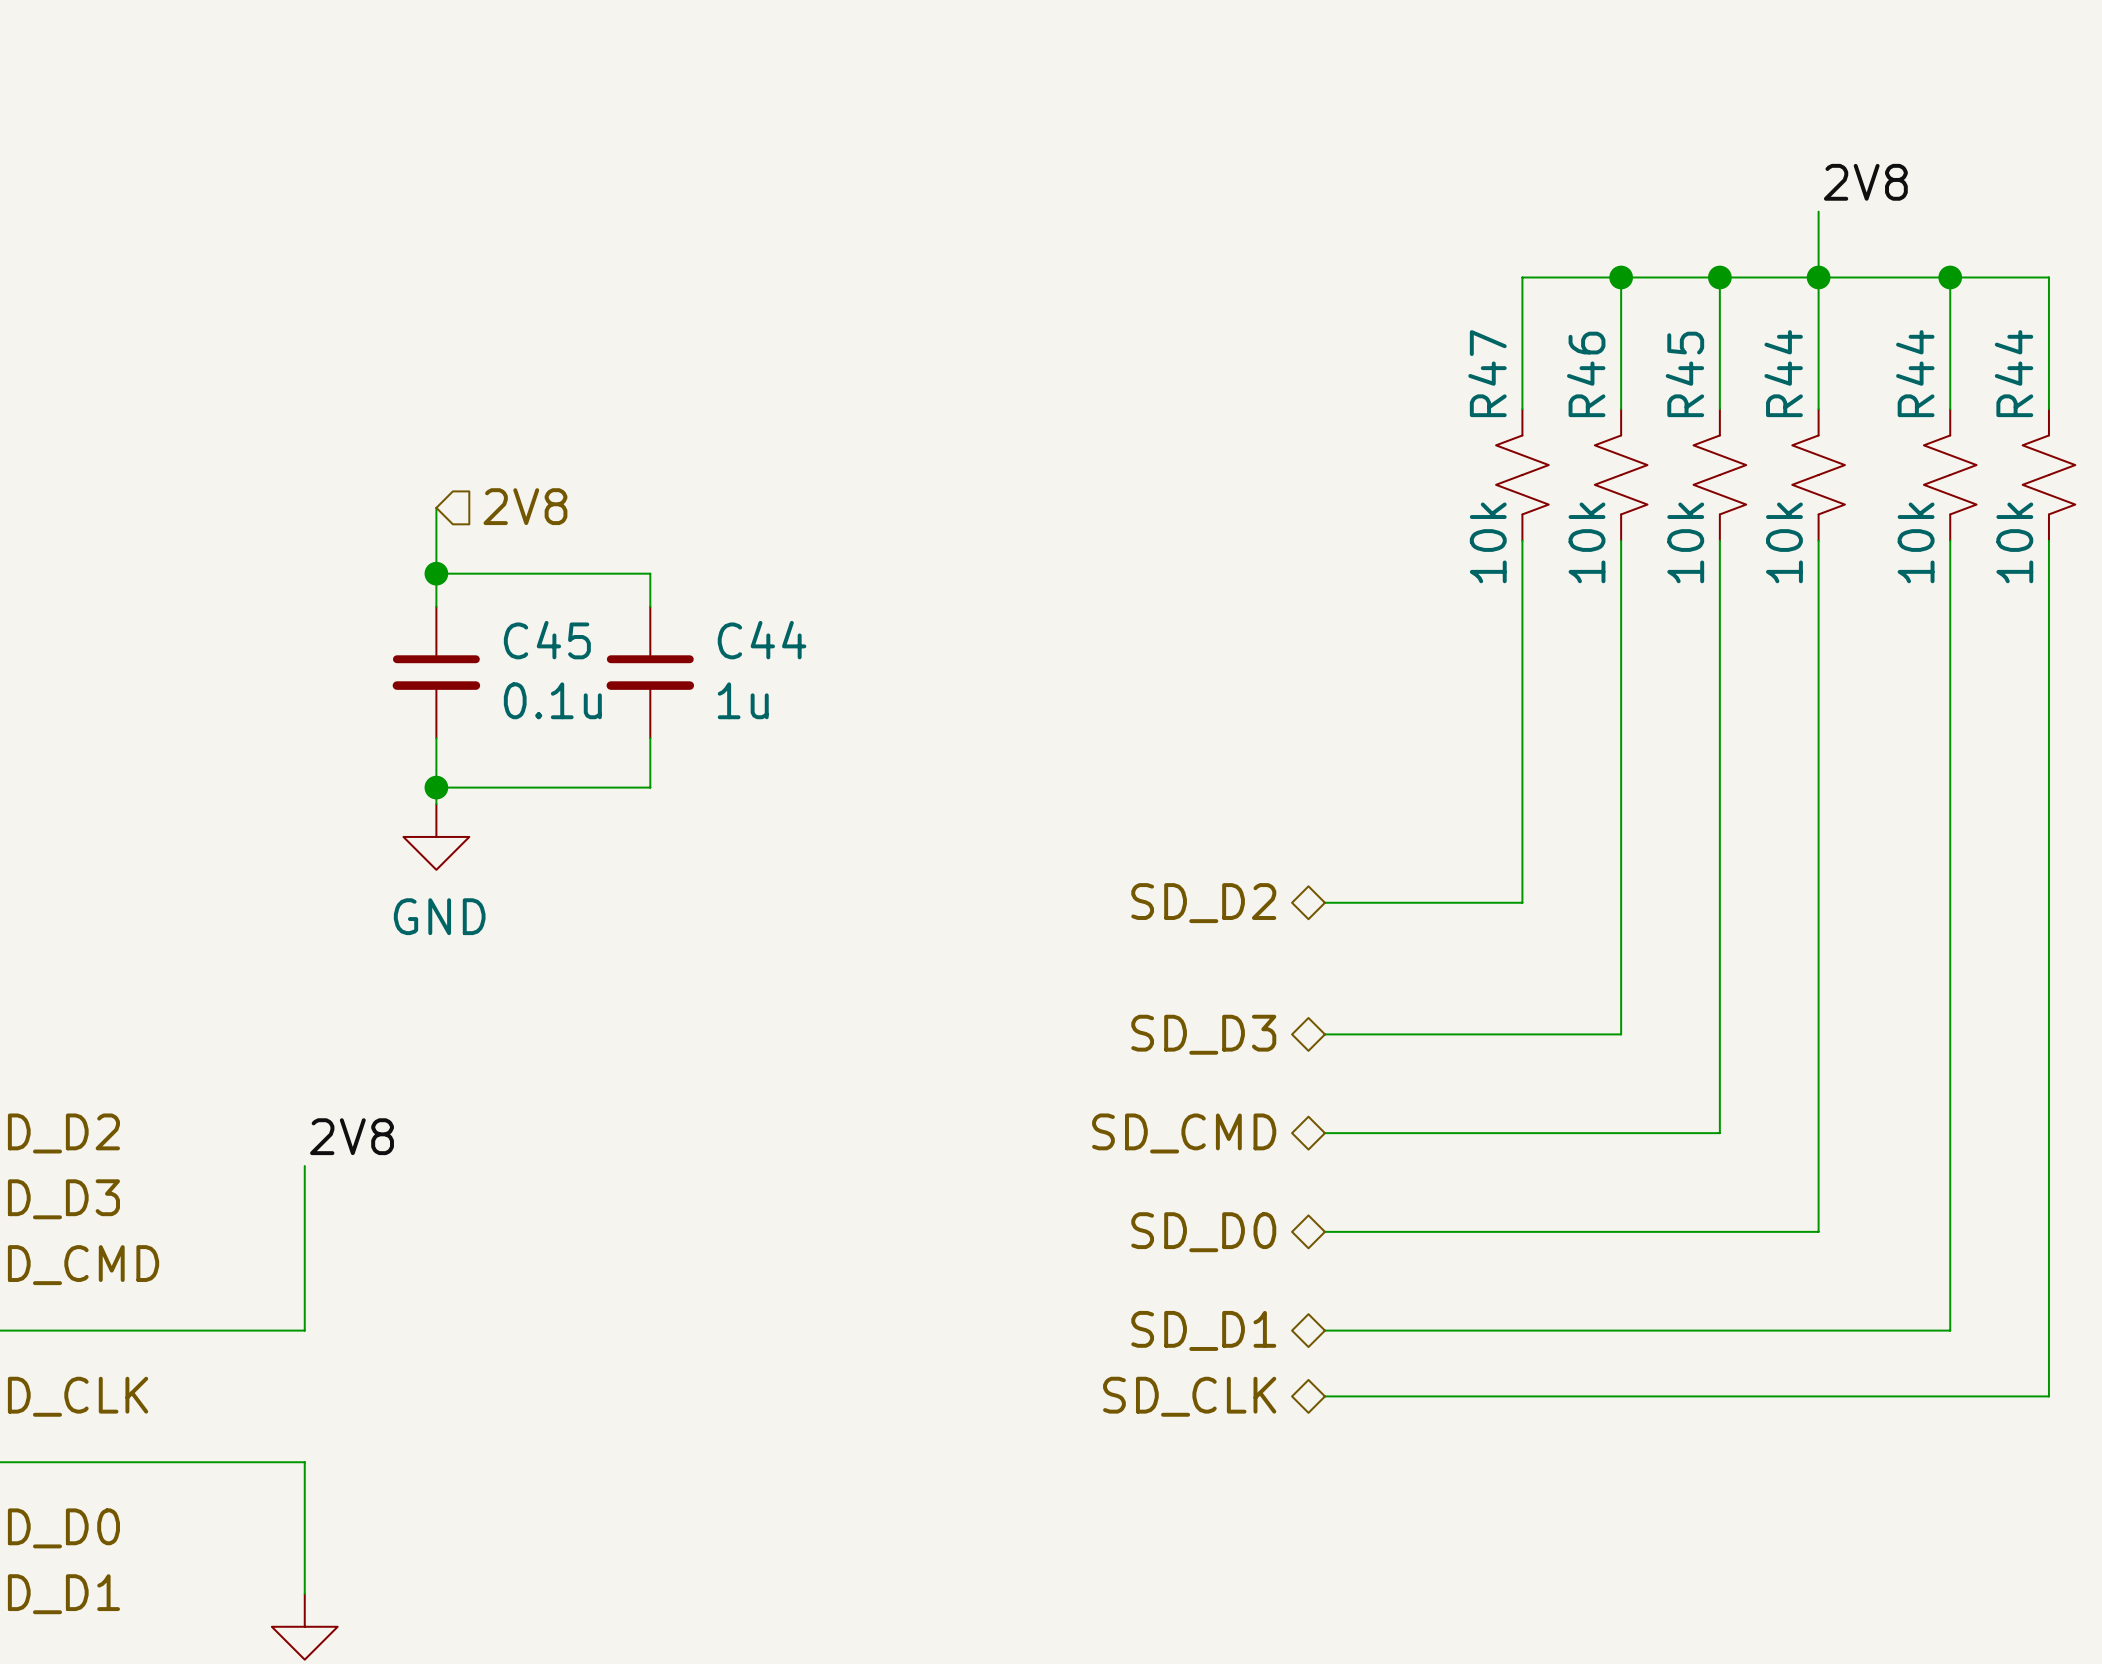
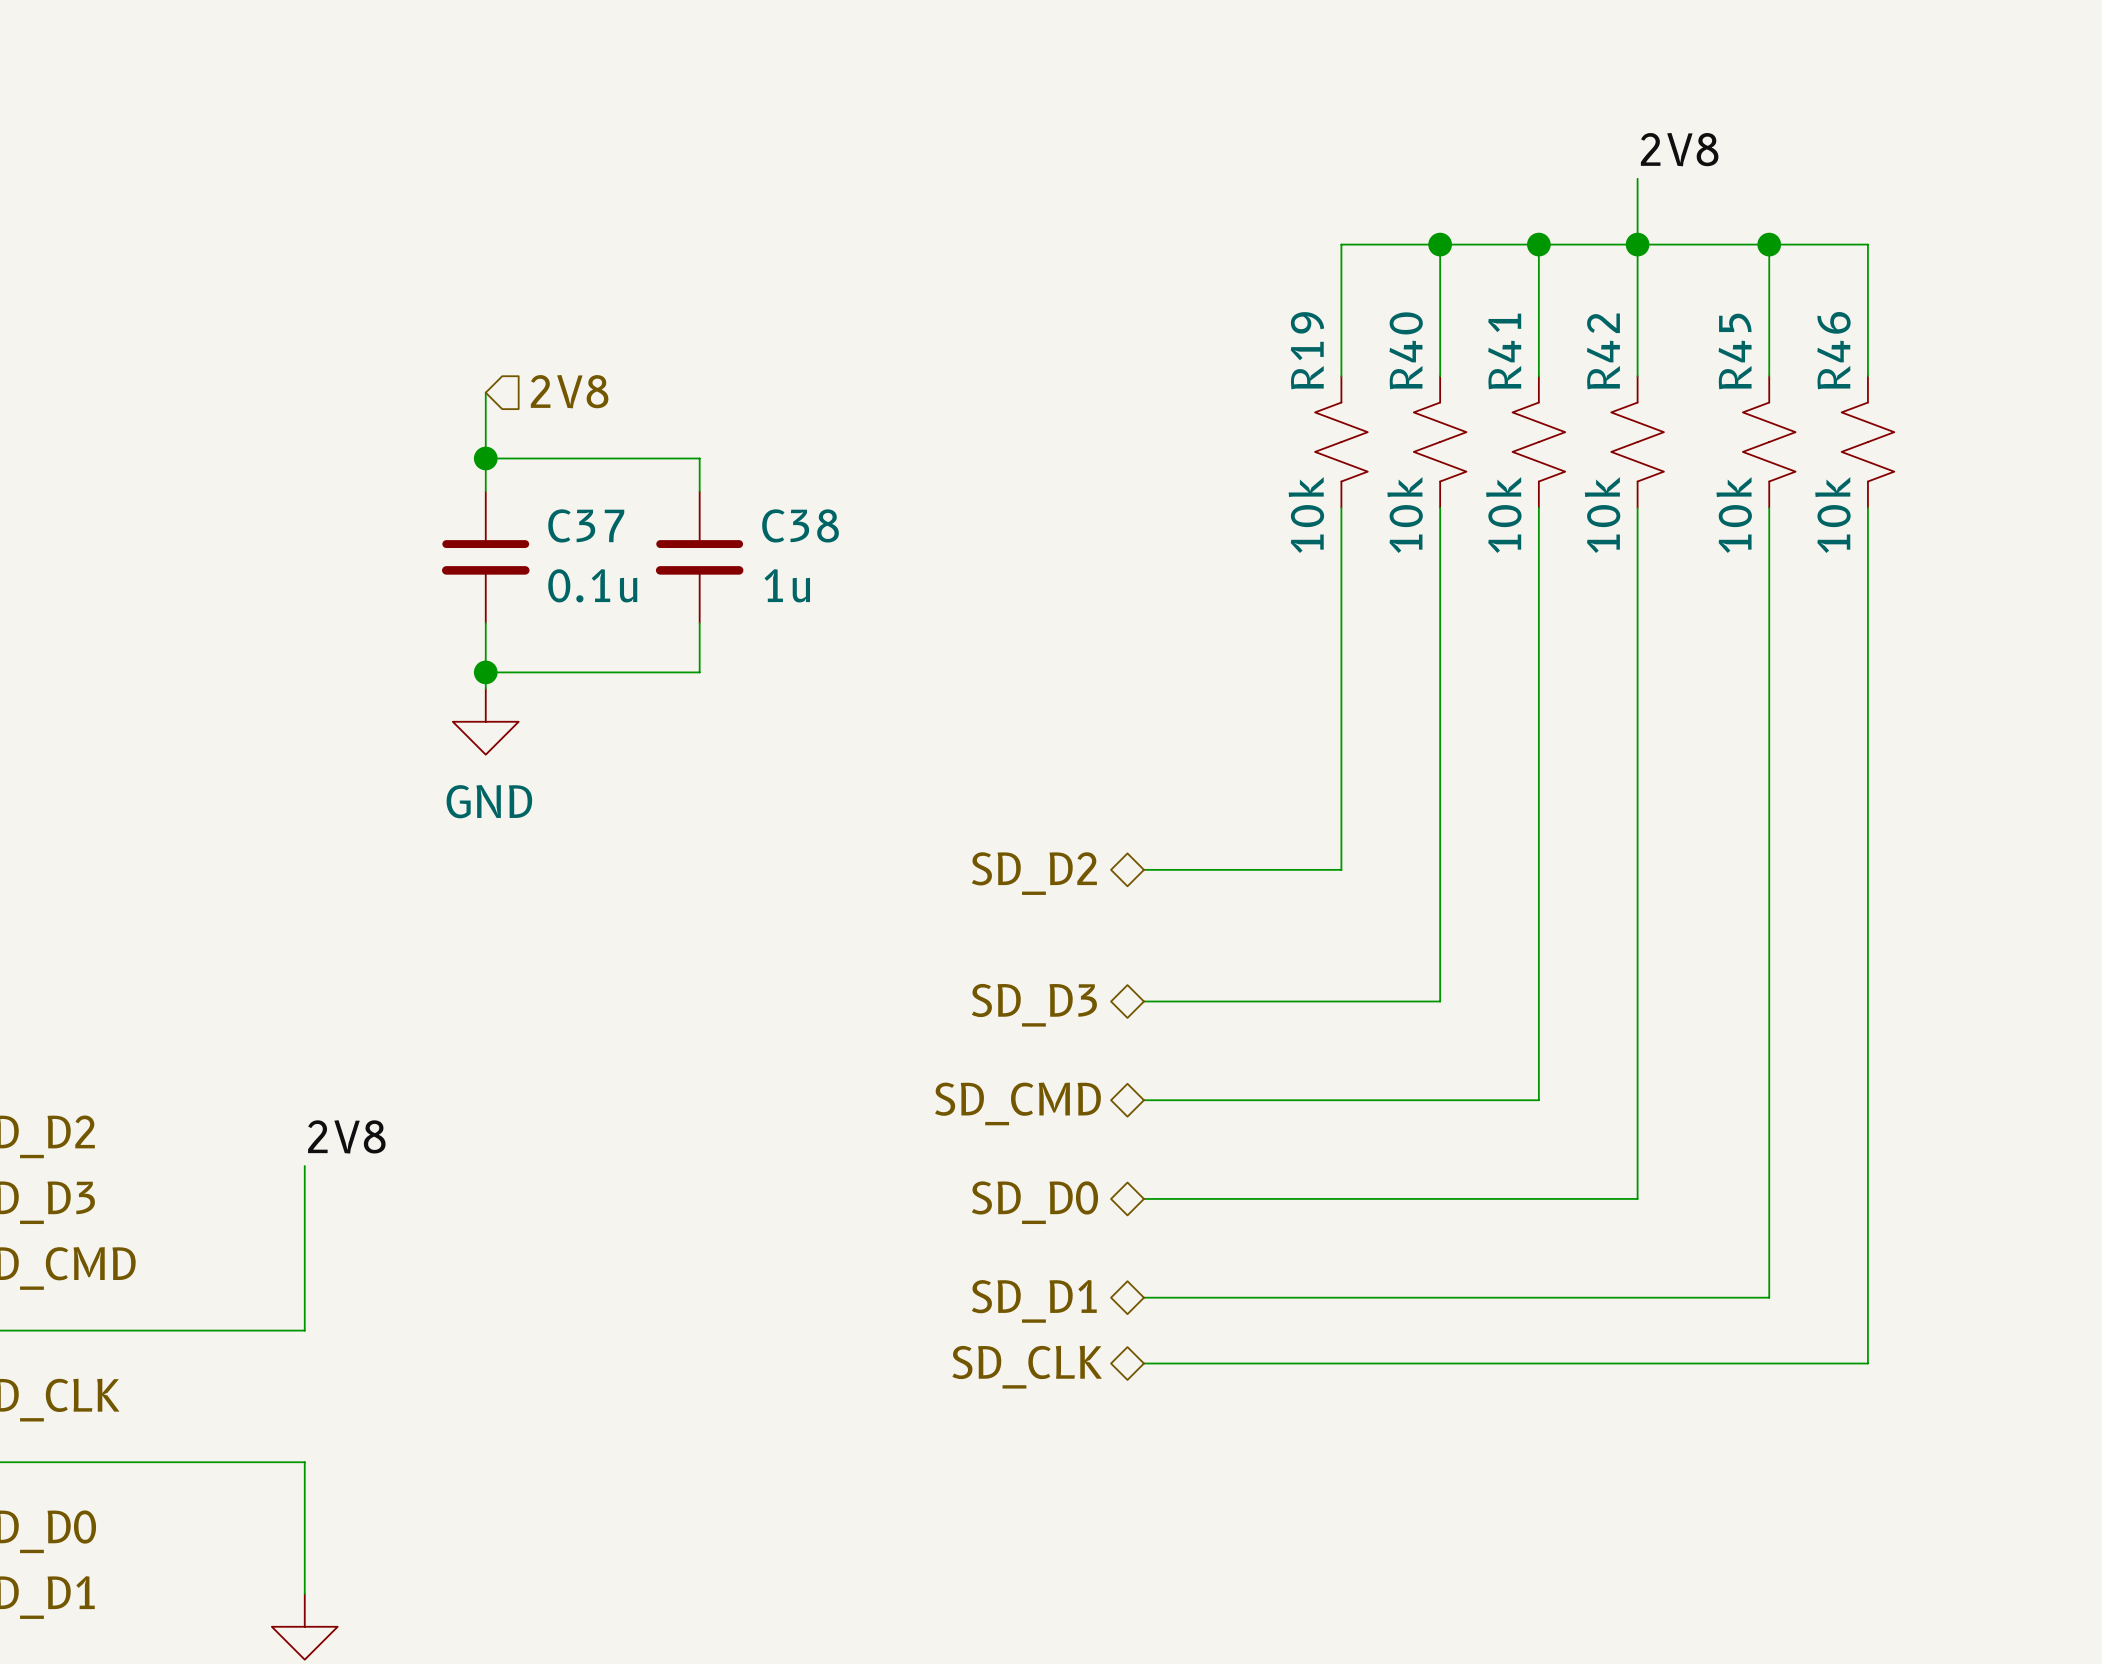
label position: 2V8 (1865, 182) -> 2V8 (1679, 149)
wire: (1818, 211) (1818, 409) -> (1637, 178) (1637, 376)
junction: none -> (1440, 244)
junction: none -> (1538, 244)
junction: none -> (1769, 244)
wire: (1621, 277) (1621, 409) -> (1440, 244) (1440, 376)
junction position: (1621, 277) -> (1637, 244)
wire: (1719, 277) (1719, 409) -> (1538, 244) (1538, 376)
junction: (1719, 277) -> none
junction: (1818, 277) -> none
wire: (1950, 277) (1950, 409) -> (1769, 244) (1769, 376)
junction: (1950, 277) -> none
wire: (1522, 409) (1522, 277) (2048, 277) (2048, 409) -> (1341, 376) (1341, 244) (1867, 244) (1867, 376)
R19: none -> 10k (1341, 442)
R40: none -> 10k (1440, 442)
R41: none -> 10k (1538, 442)
R42: none -> 10k (1637, 442)
junction: none -> (485, 458)
R47: 10k (1522, 474) -> none
R46 position: (1621, 474) -> (1867, 442)
R45 position: (1719, 474) -> (1769, 442)
R44: 10k (1818, 474) -> none
R44: 10k (1950, 474) -> none
R44: 10k (2048, 474) -> none
hierarchical label position: 2V8 (525, 506) -> 2V8 (569, 391)
wire: (436, 507) (436, 606) -> (485, 392) (485, 491)
wire: (1522, 540) (1522, 902) (1324, 902) -> (1341, 507) (1341, 869) (1143, 869)
wire: (1621, 540) (1621, 1034) (1324, 1034) -> (1440, 507) (1440, 1001) (1143, 1001)
wire: (1719, 540) (1719, 1133) (1324, 1133) -> (1538, 507) (1538, 1100) (1143, 1100)
wire: (1818, 540) (1818, 1231) (1324, 1231) -> (1637, 507) (1637, 1198) (1143, 1198)
wire: (1950, 540) (1950, 1330) (1324, 1330) -> (1769, 507) (1769, 1297) (1143, 1297)
wire: (2048, 540) (2048, 1396) (1324, 1396) -> (1867, 507) (1867, 1363) (1143, 1363)
C37: none -> 0.1u (485, 557)
C38: none -> 1u (699, 557)
wire: (436, 573) (650, 573) (650, 606) -> (485, 458) (699, 458) (699, 491)
junction: (436, 573) -> none
C45: 0.1u (436, 672) -> none
junction: none -> (485, 672)
C44: 1u (650, 672) -> none
wire: (436, 738) (436, 804) -> (485, 623) (485, 688)
wire: (650, 738) (650, 787) (436, 787) -> (699, 623) (699, 672) (485, 672)
junction: (436, 787) -> none
power symbol position: GND (436, 836) -> GND (485, 721)
hierarchical label position: SD_D2 (1203, 903) -> SD_D2 (1034, 873)
hierarchical label position: SD_D3 (1203, 1034) -> SD_D3 (1034, 1005)
hierarchical label position: SD_CMD (1184, 1133) -> SD_CMD (1017, 1103)
hierarchical label position: SD_D0 (1203, 1232) -> SD_D0 (1034, 1202)
hierarchical label position: SD_D1 (1203, 1330) -> SD_D1 (1034, 1301)
hierarchical label position: SD_CLK (1189, 1396) -> SD_CLK (1027, 1367)

